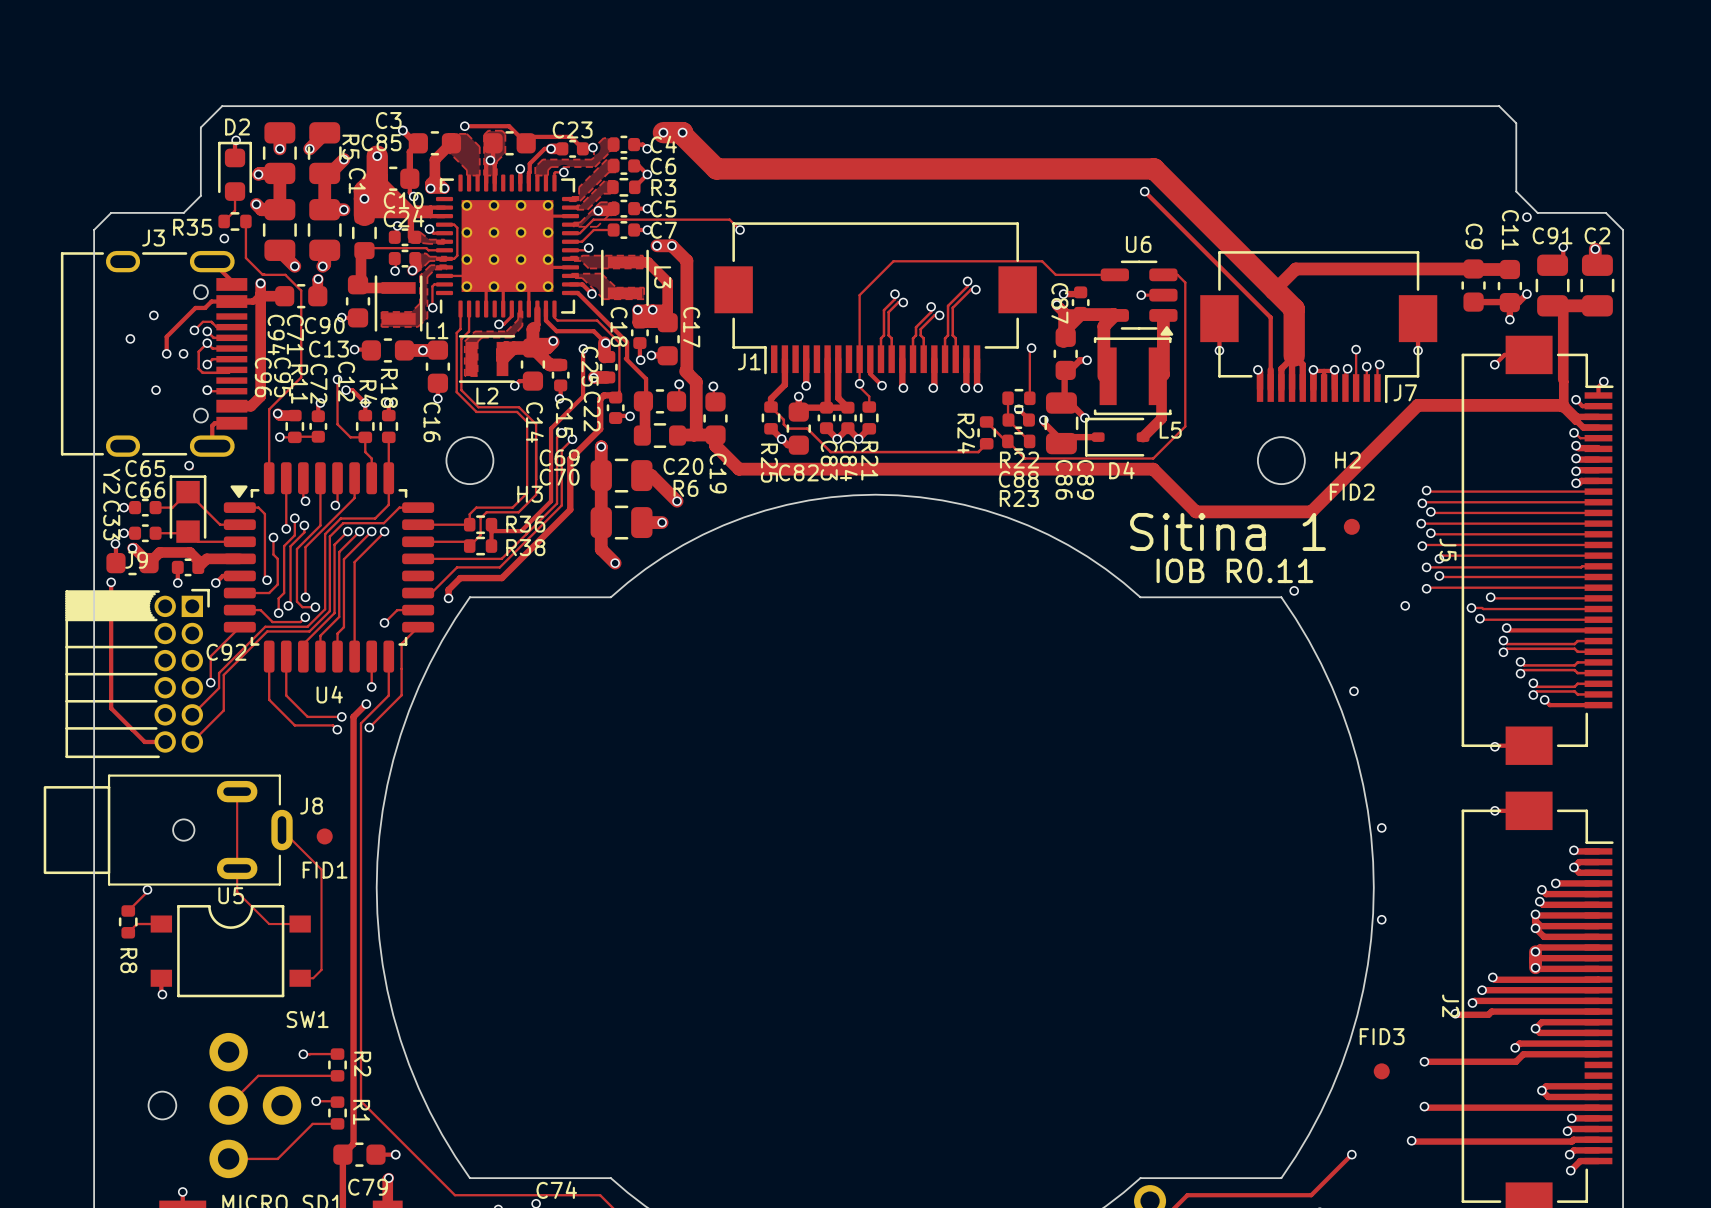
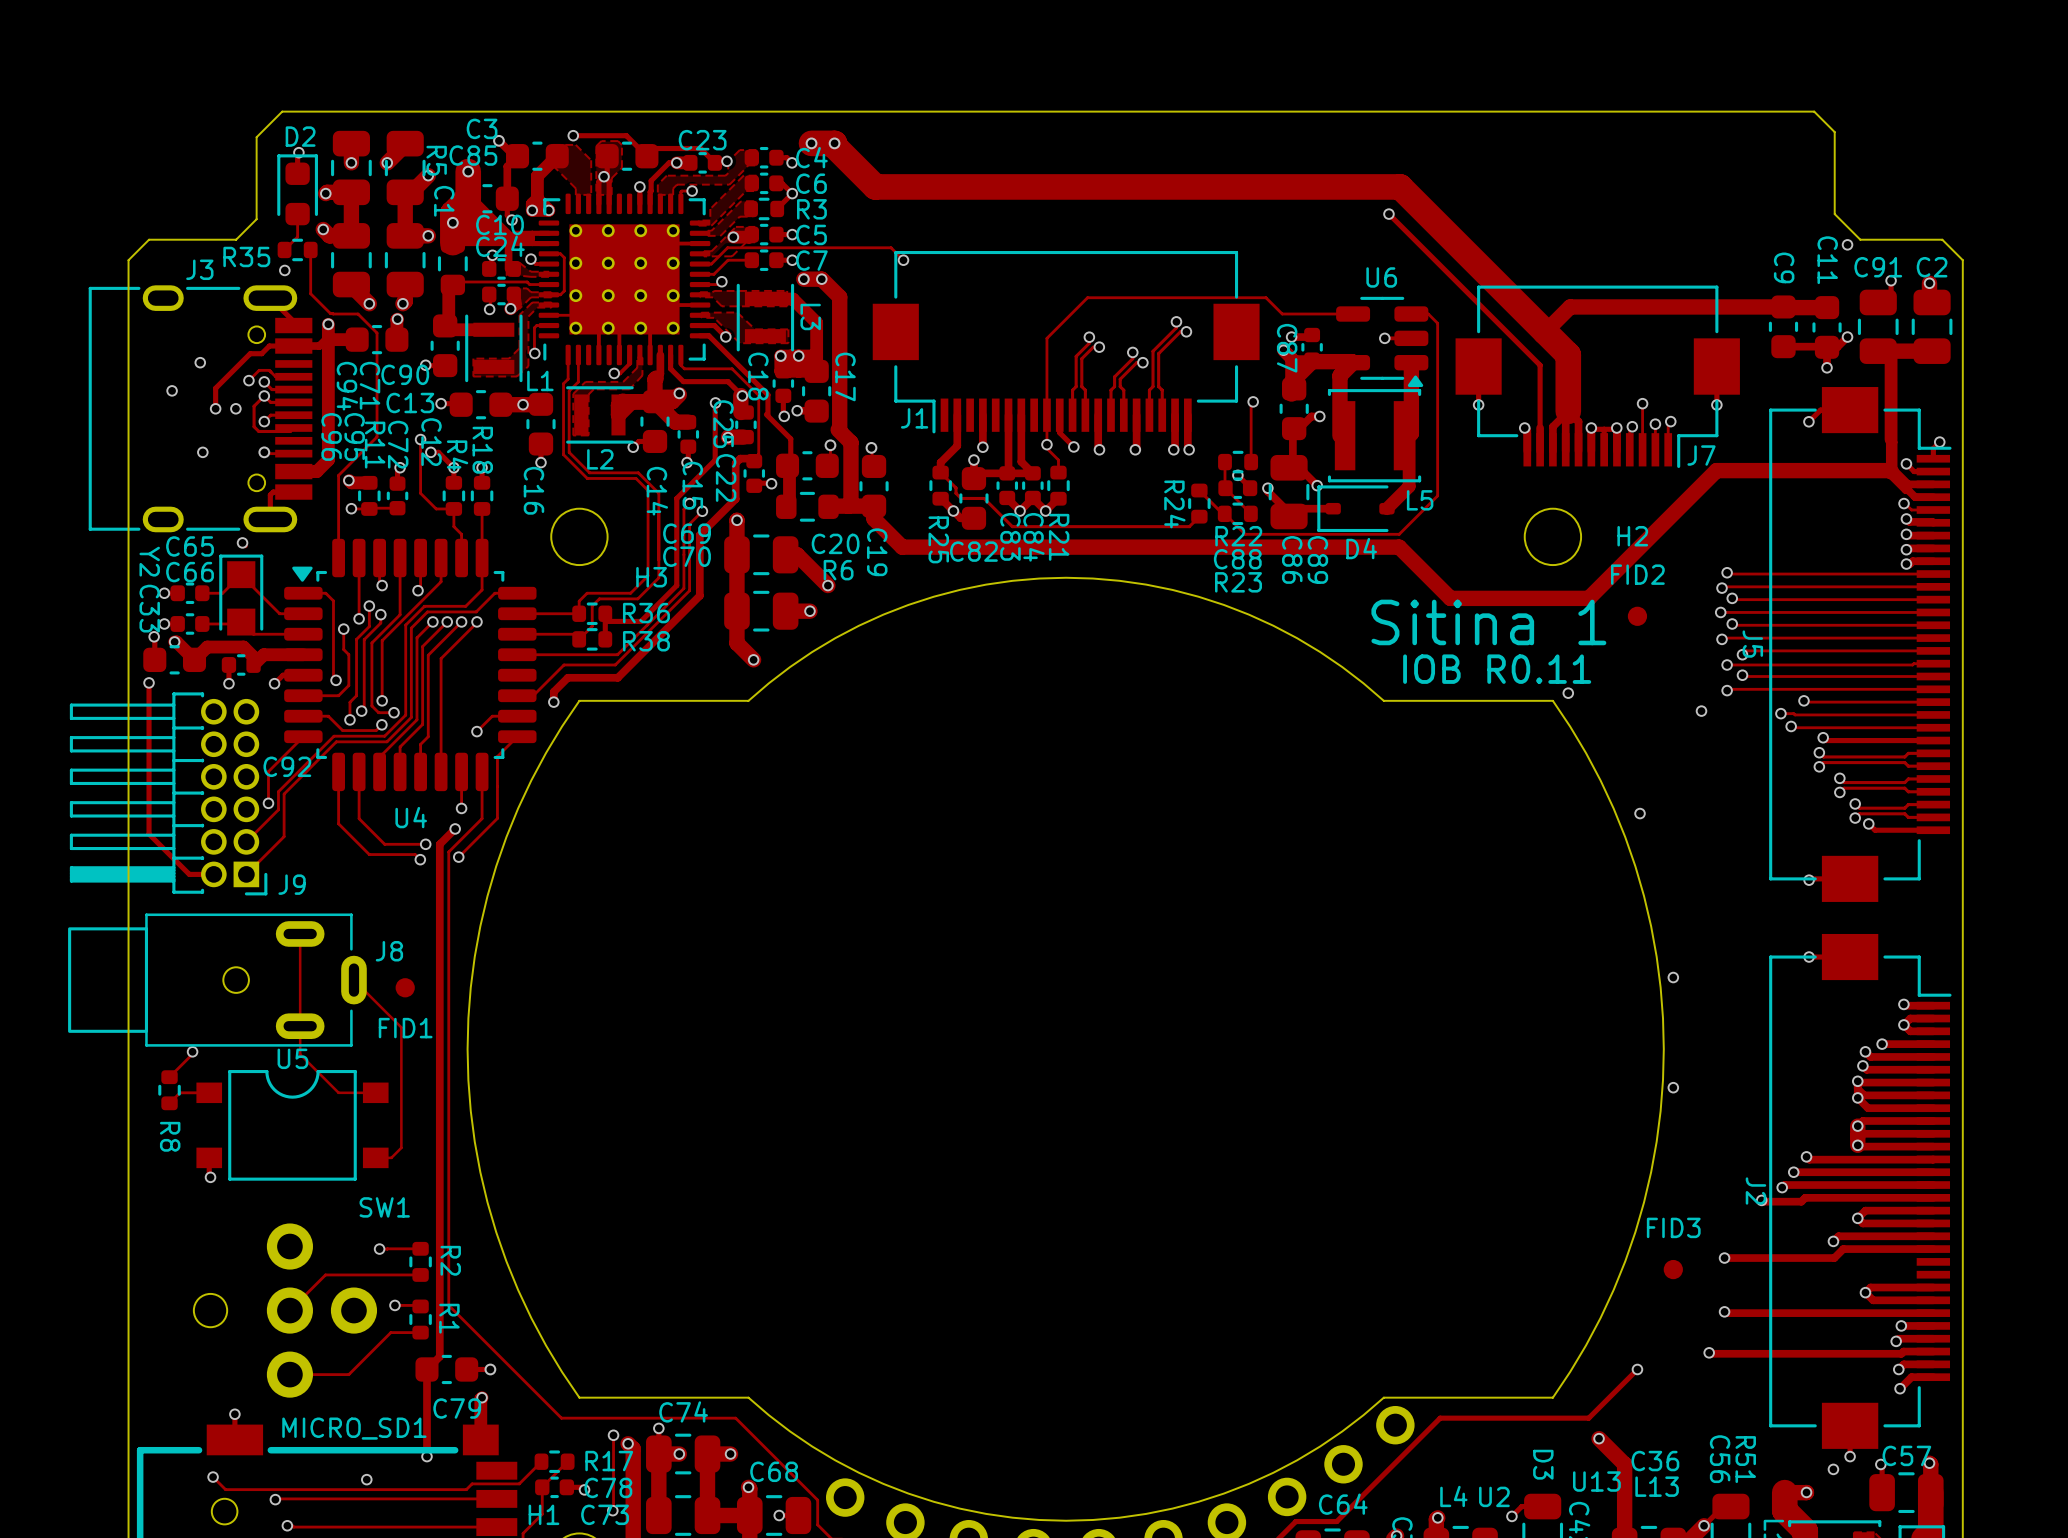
J9 name position: J9 (136, 560) -> J9 (292, 884)
J9 footprint: [65, 588, 210, 759] -> [69, 692, 268, 896]

